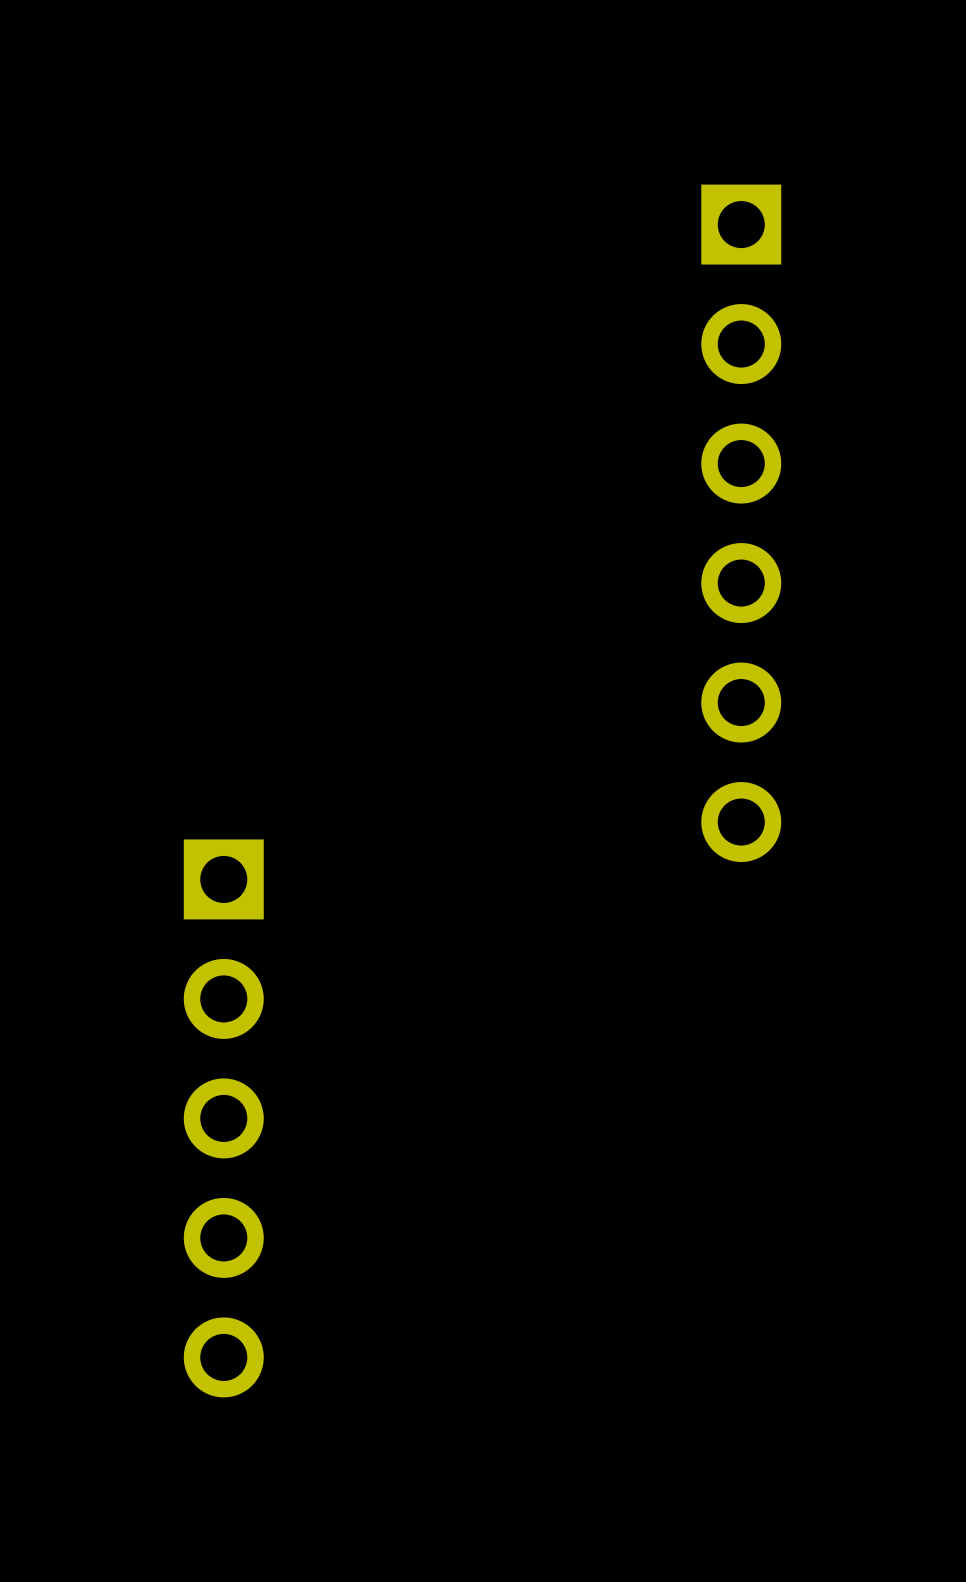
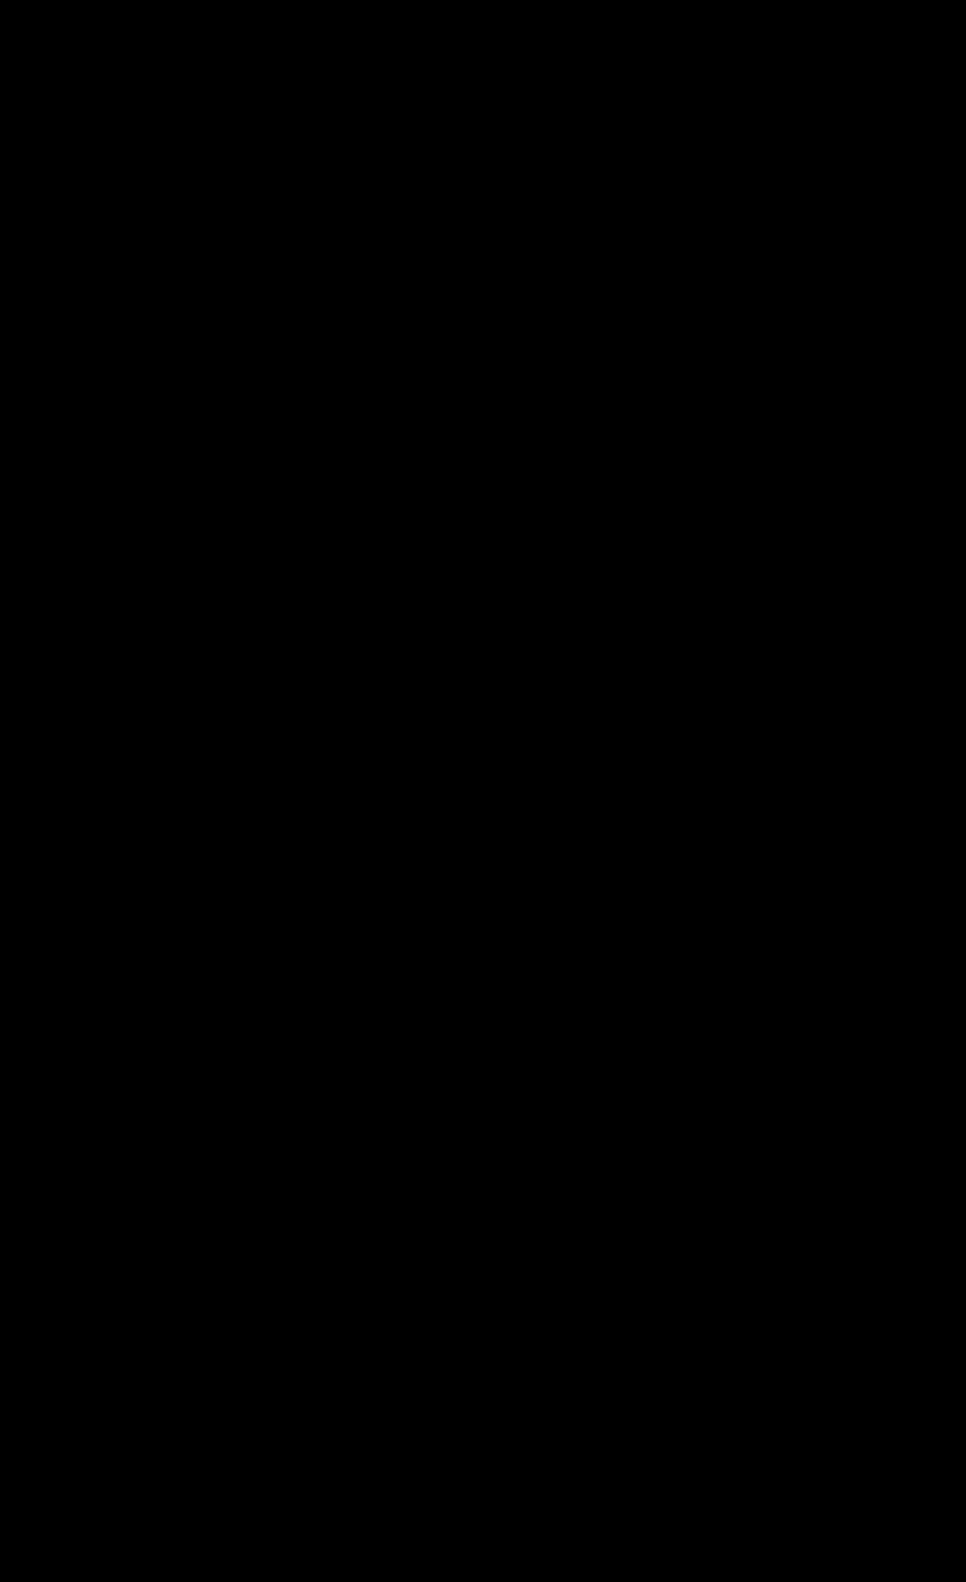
part: (741, 523) -> none
part: (223, 1118) -> none

